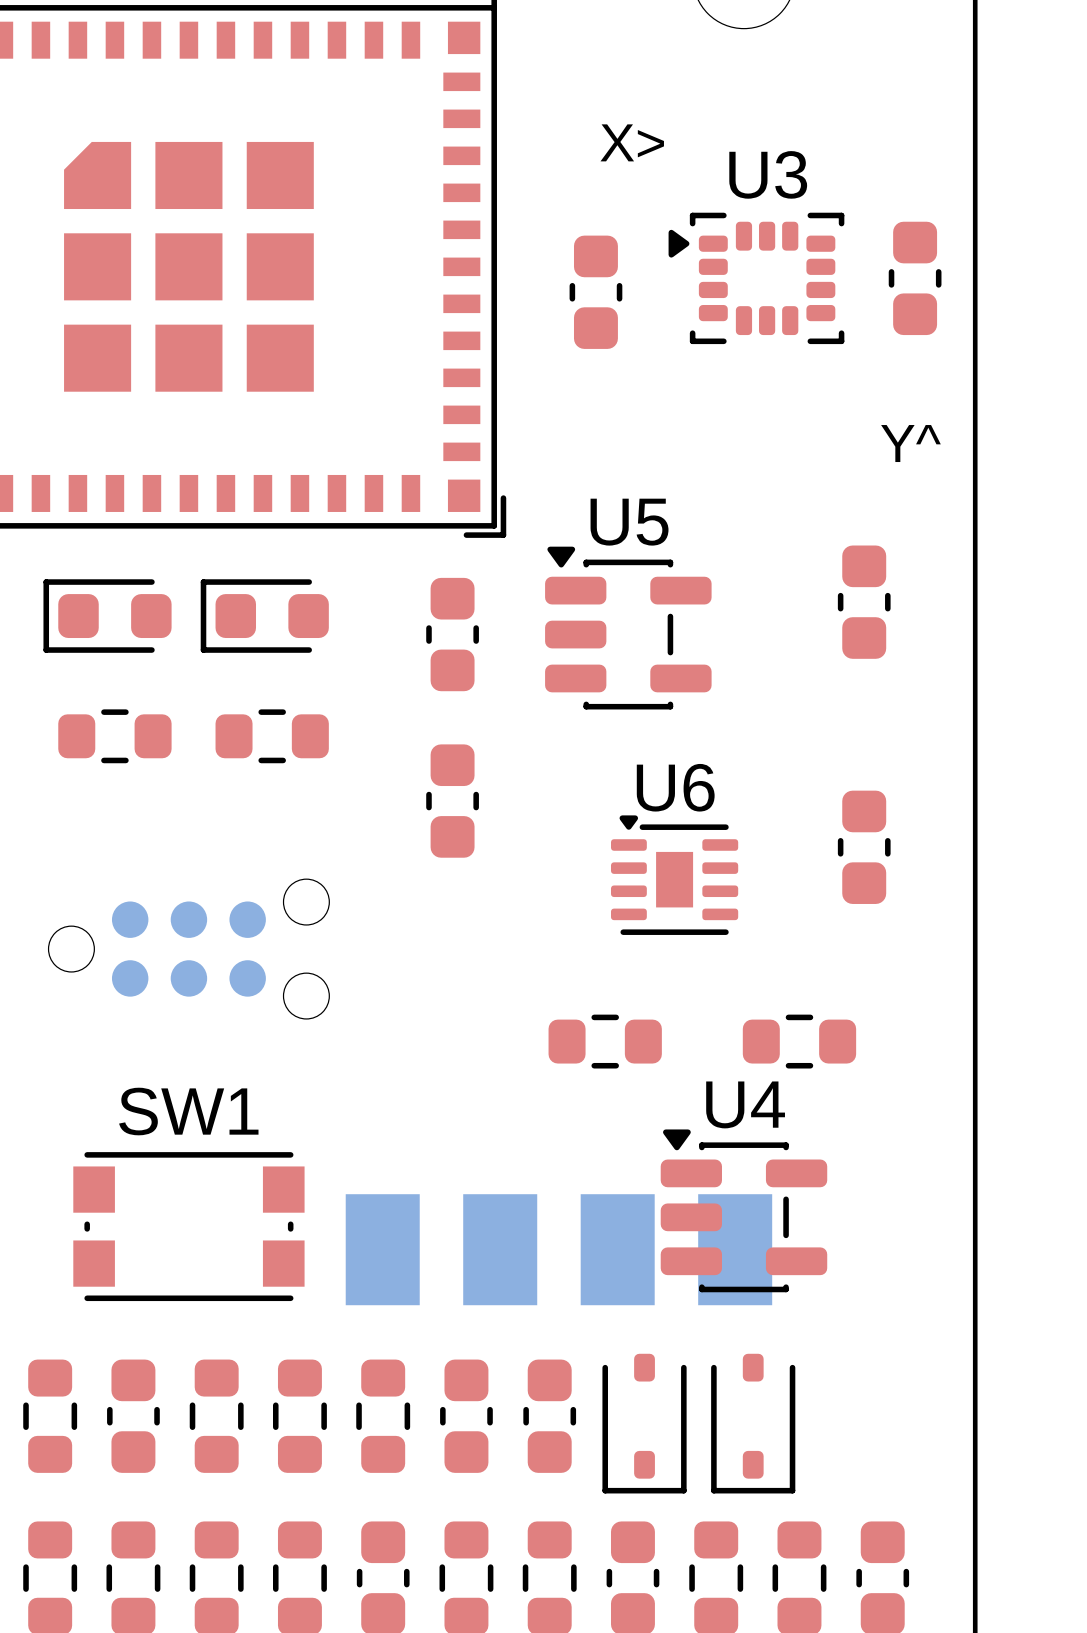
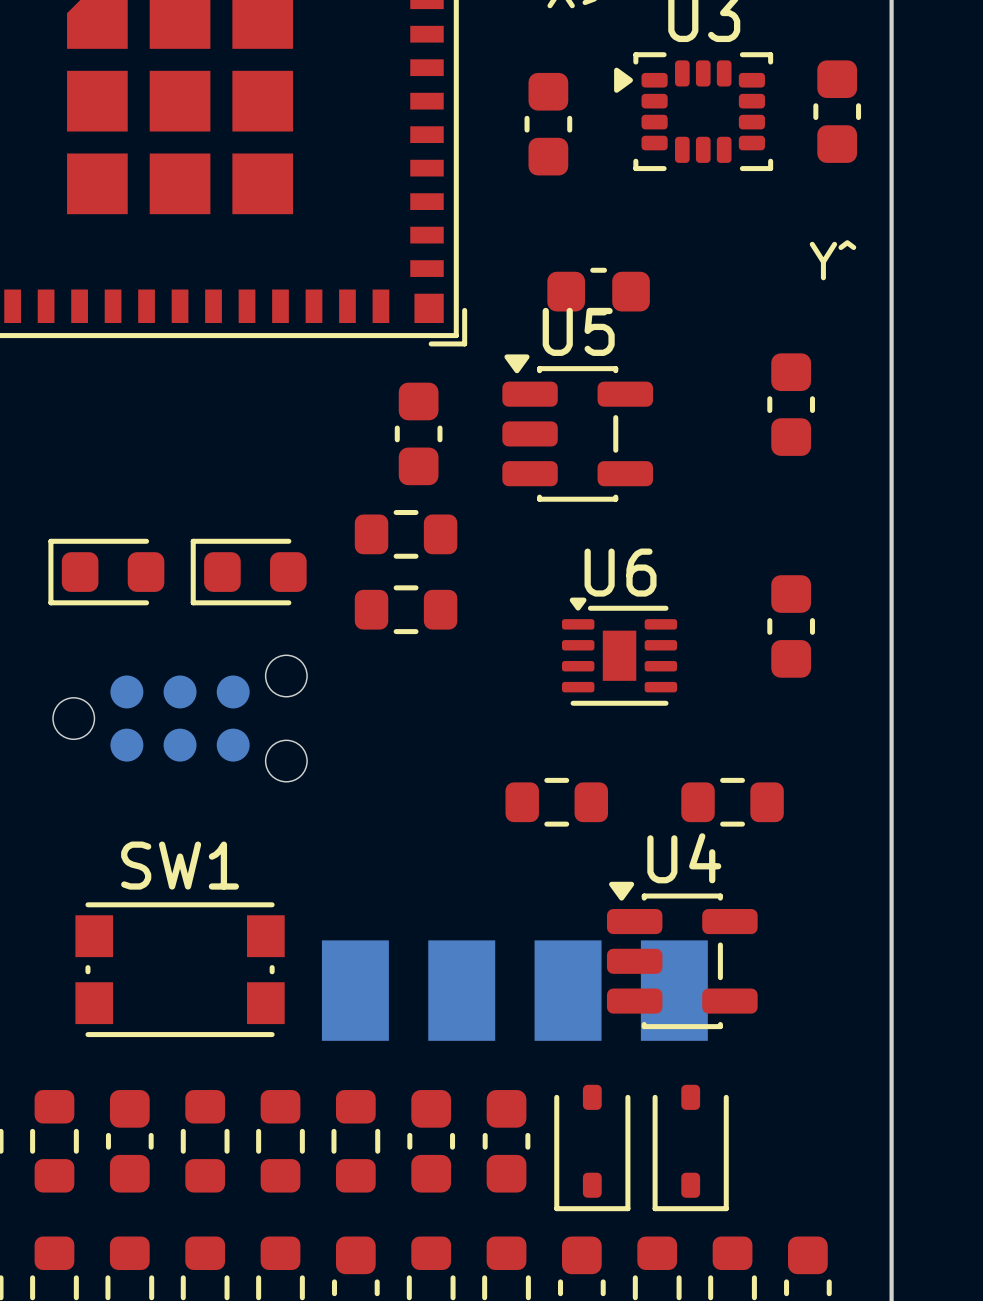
part: (107, 616) -> none
part: (264, 616) -> none
part: (114, 736) -> none
part: (272, 736) -> none
part: none -> (406, 534)
part: none -> (106, 572)
part: none -> (248, 572)
part rotation: 0° (452, 801) -> 90° clockwise (598, 291)
part position: (452, 801) -> (598, 291)
part: none -> (406, 609)

